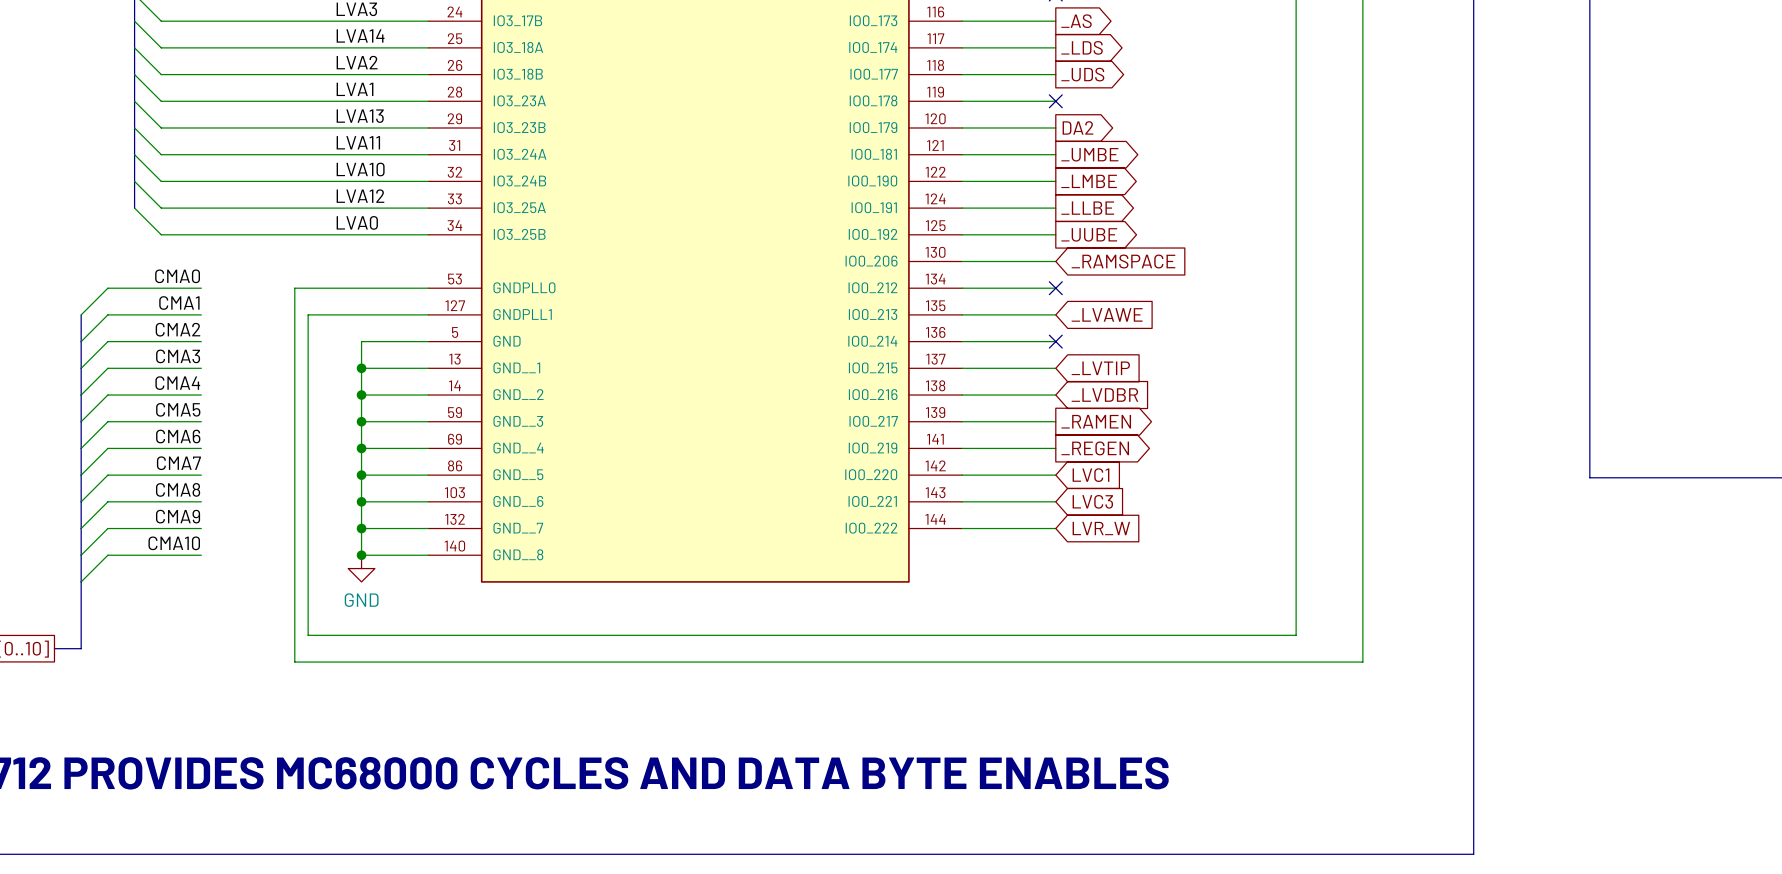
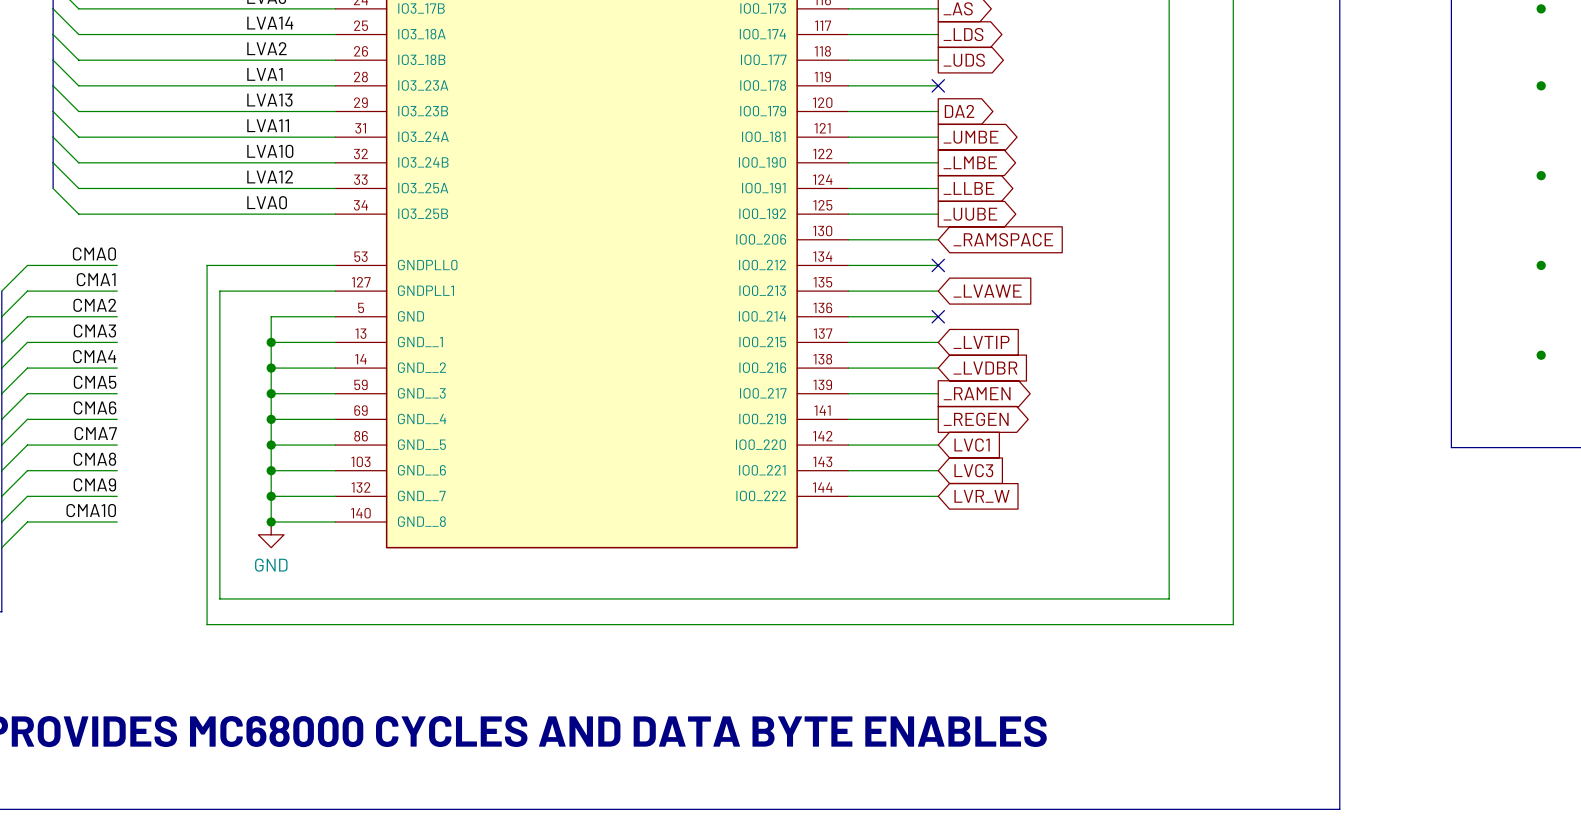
junction: none -> (1541, 8)
junction: none -> (1541, 85)
junction: none -> (1541, 175)
junction: none -> (1541, 265)
junction: none -> (1541, 355)

